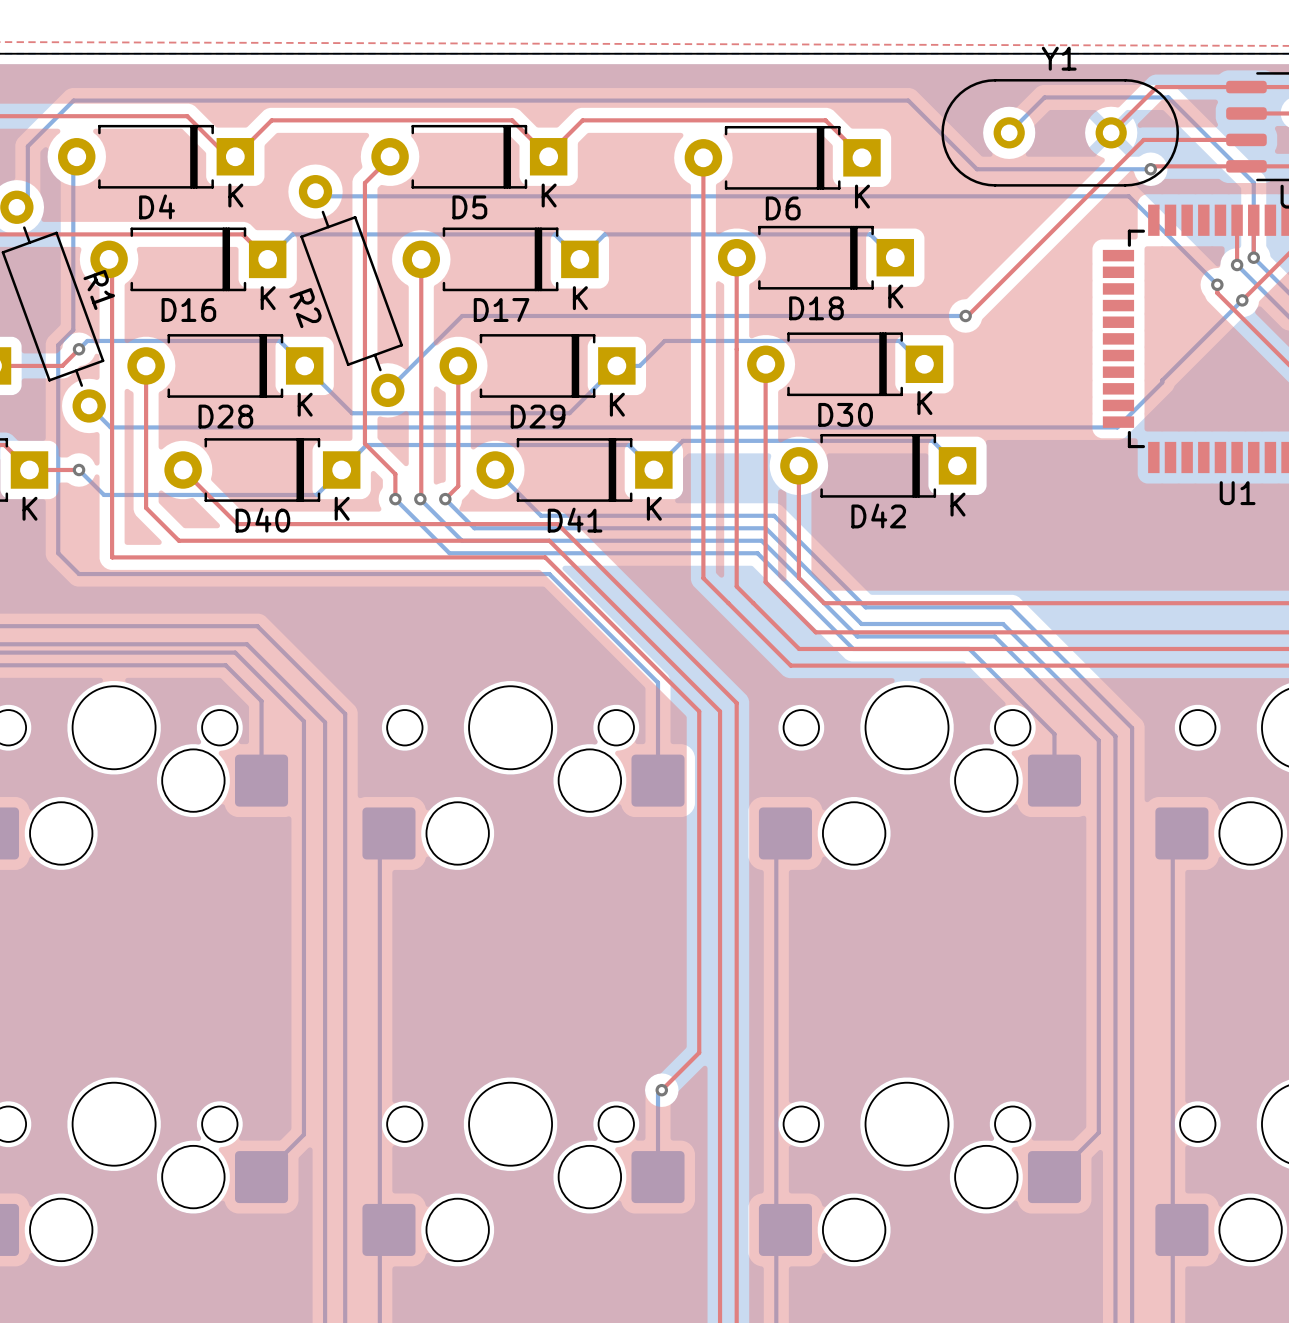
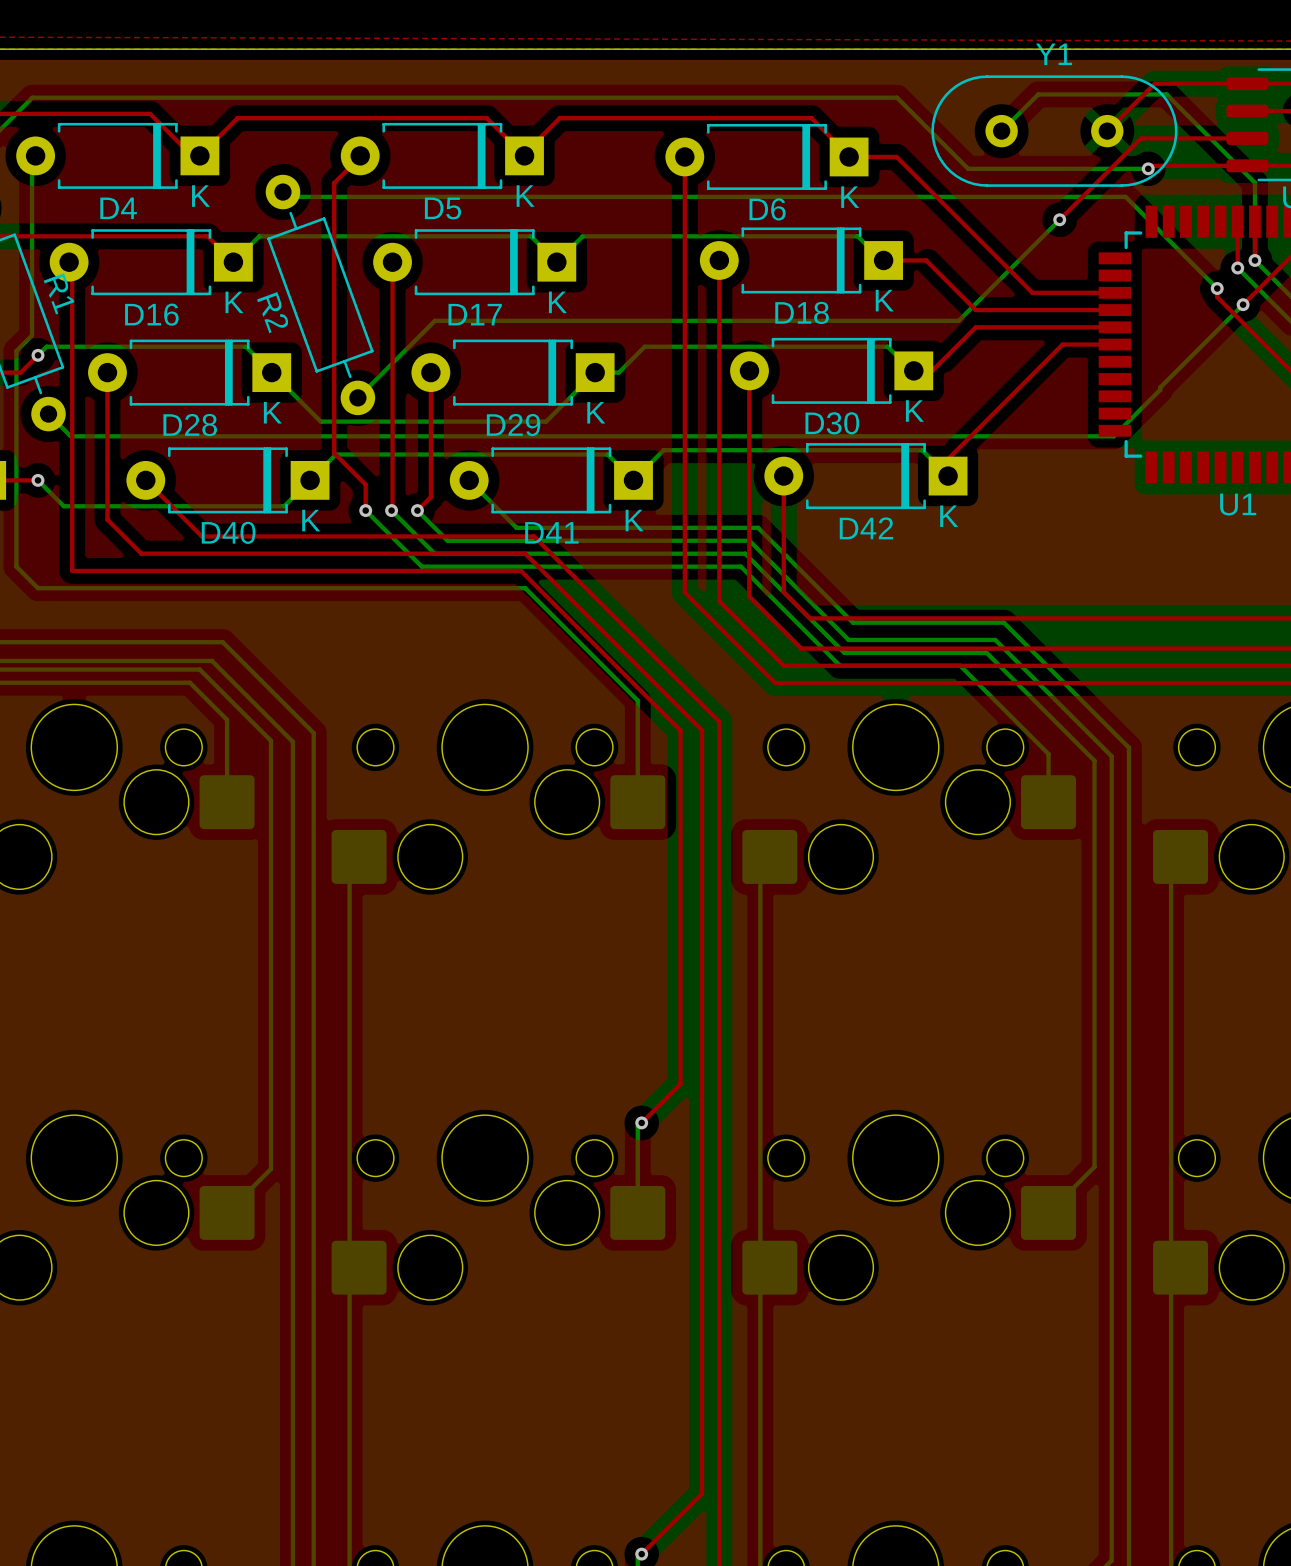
top track: none -> (849, 156) (896, 156) (1032, 292) (1114, 292)
top track: (1065, 218) (965, 315) -> none
bottom track: none -> (1059, 219) (958, 320) (956, 320)
via: none -> (1059, 219)
top track: none -> (883, 260) (926, 260) (975, 310) (1114, 310)
via: (965, 315) -> none
top track: none -> (1114, 327) (975, 327) (932, 370) (913, 370)
top track: none -> (1114, 344) (1062, 344) (948, 459) (948, 476)

